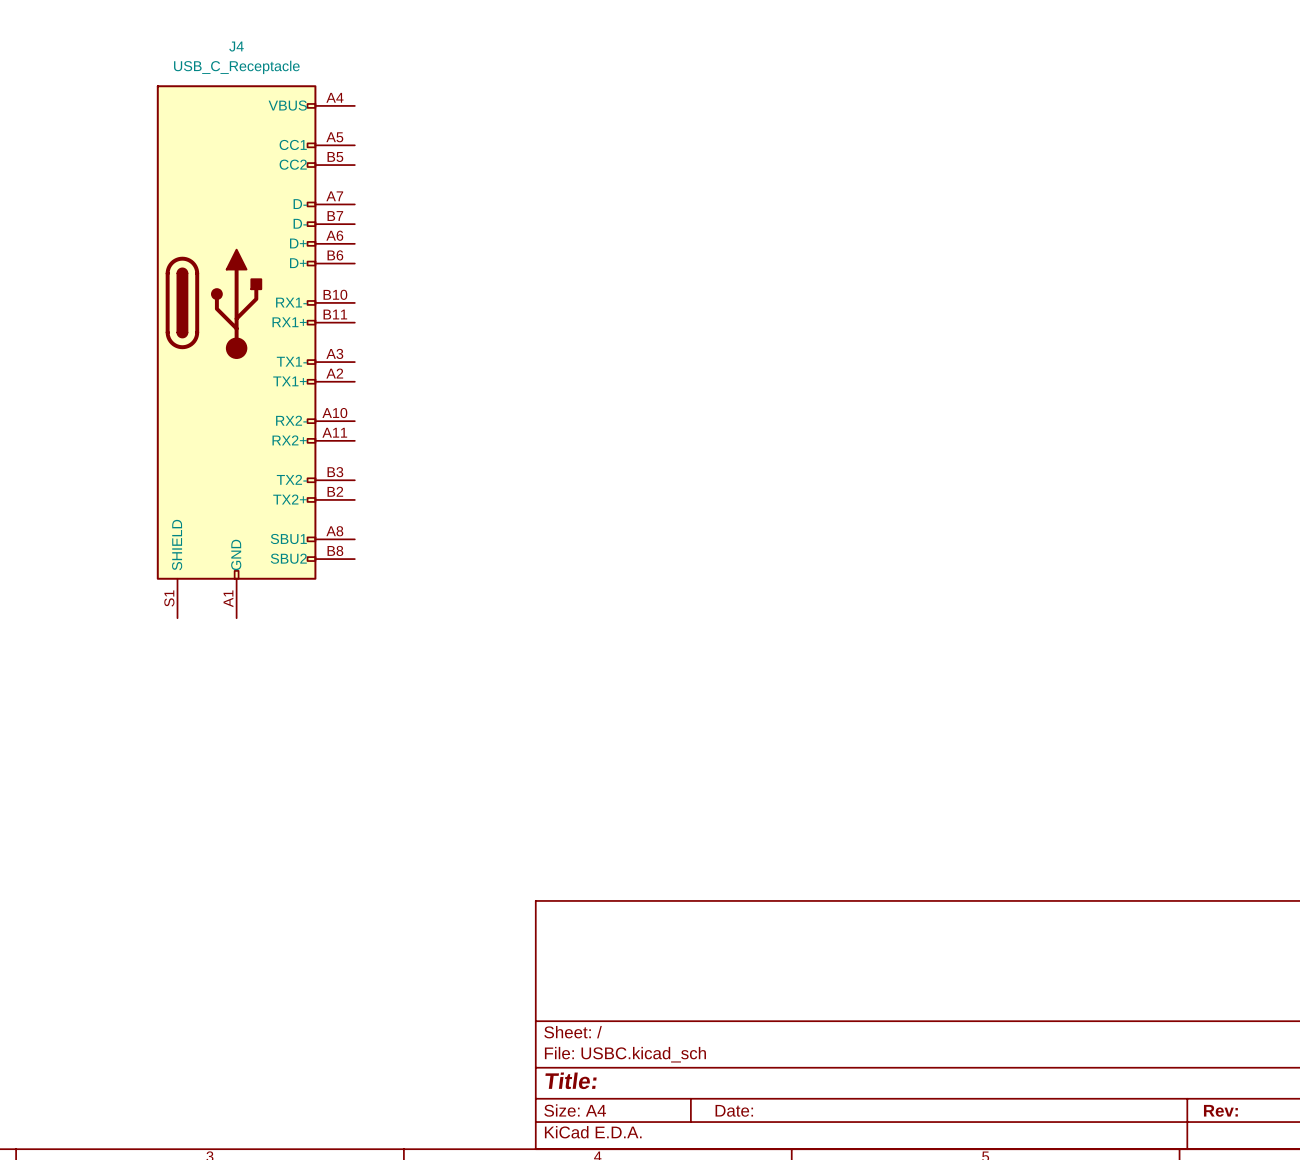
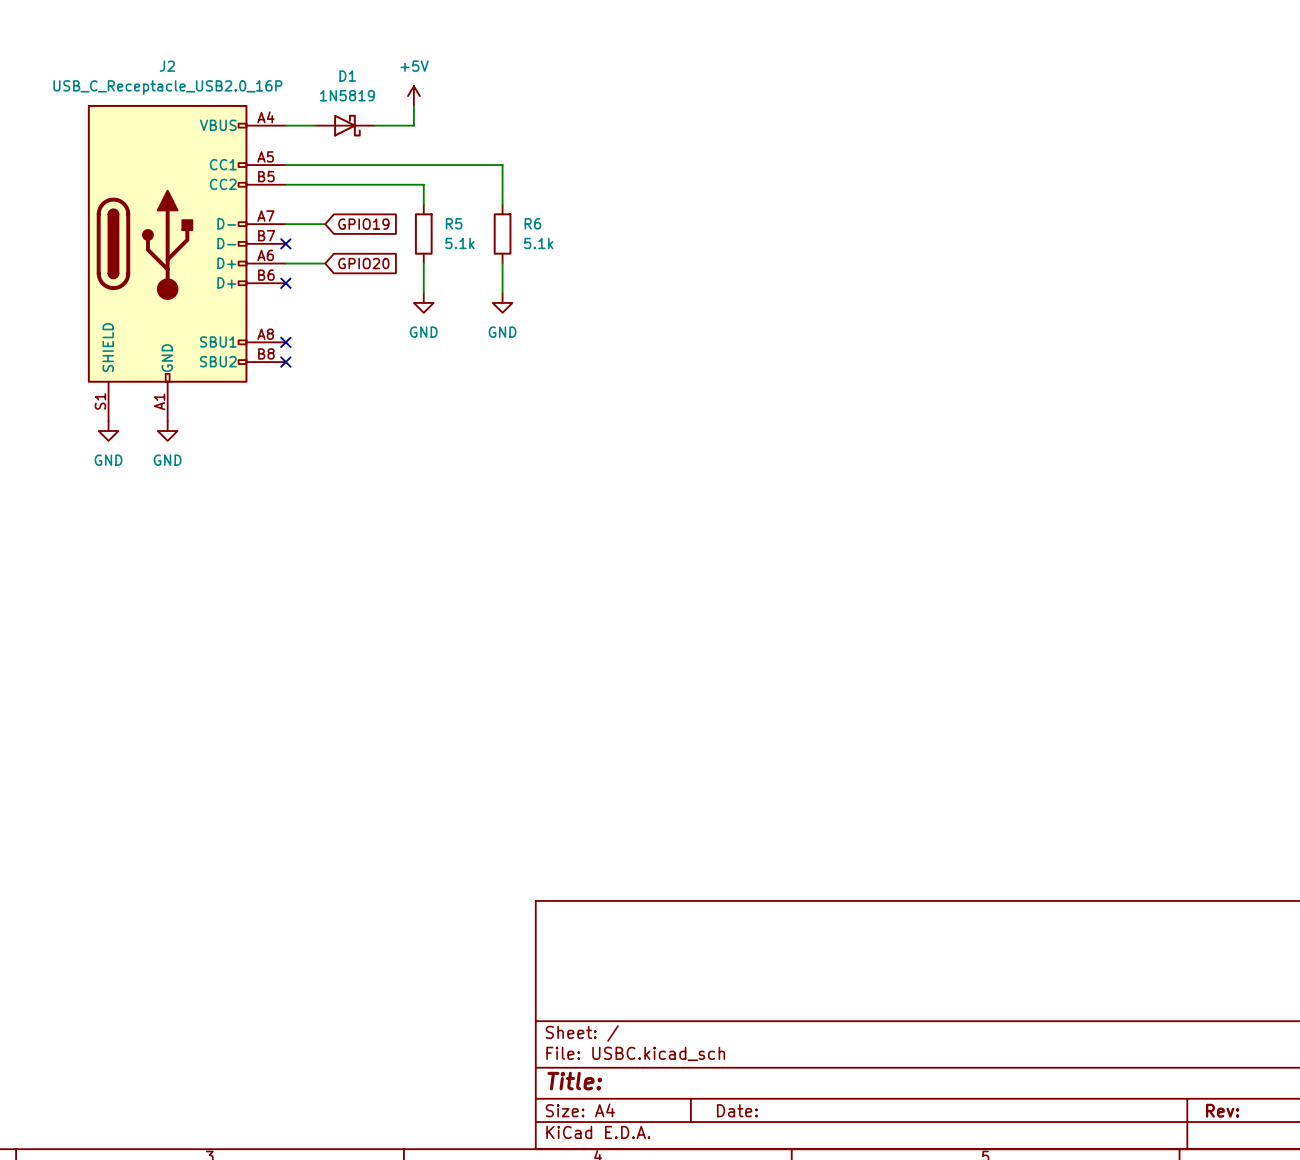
power symbol: none -> +5V (413, 96)
wire: none -> (413, 105) (413, 125) (374, 125)
D1: none -> 1N5819 (344, 125)
wire: none -> (285, 165) (502, 165) (502, 204)
wire: none -> (285, 184) (423, 184) (423, 204)
global label: none -> GPIO19 (363, 224)
R5: none -> 5.1k (423, 233)
R6: none -> 5.1k (502, 233)
no-connect mark: none -> (285, 243)
J2: none -> USB_C_Receptacle_USB2.0_16P (186, 263)
global label: none -> GPIO20 (363, 263)
wire: none -> (423, 263) (423, 293)
wire: none -> (502, 263) (502, 293)
no-connect mark: none -> (285, 283)
power symbol: none -> GND (423, 302)
power symbol: none -> GND (502, 302)
no-connect mark: none -> (285, 342)
J4: USB_C_Receptacle (255, 351) -> none
no-connect mark: none -> (285, 362)
power symbol: none -> GND (108, 431)
power symbol: none -> GND (167, 431)

